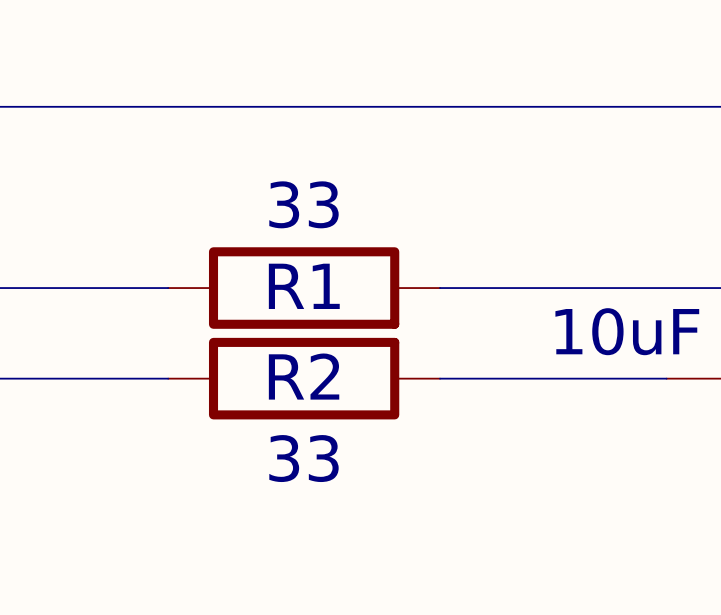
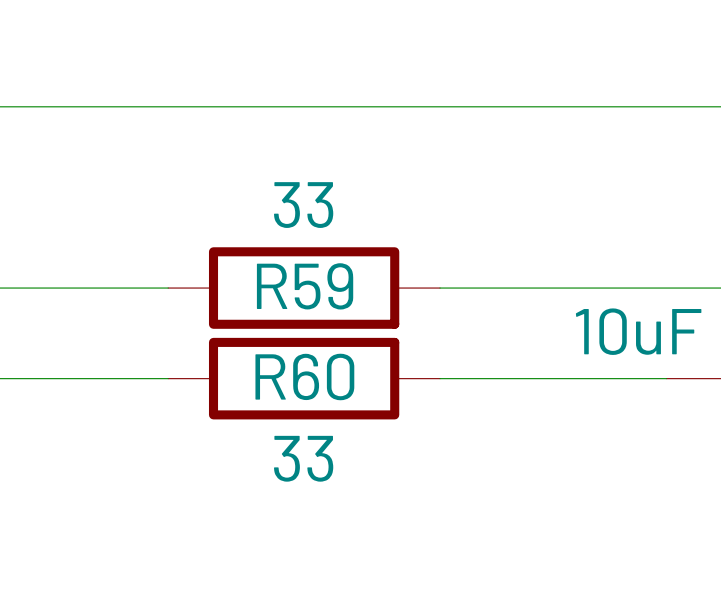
R1 name: R1 (304, 286) -> R59 (305, 286)
R2 name: R2 (304, 376) -> R60 (304, 376)

